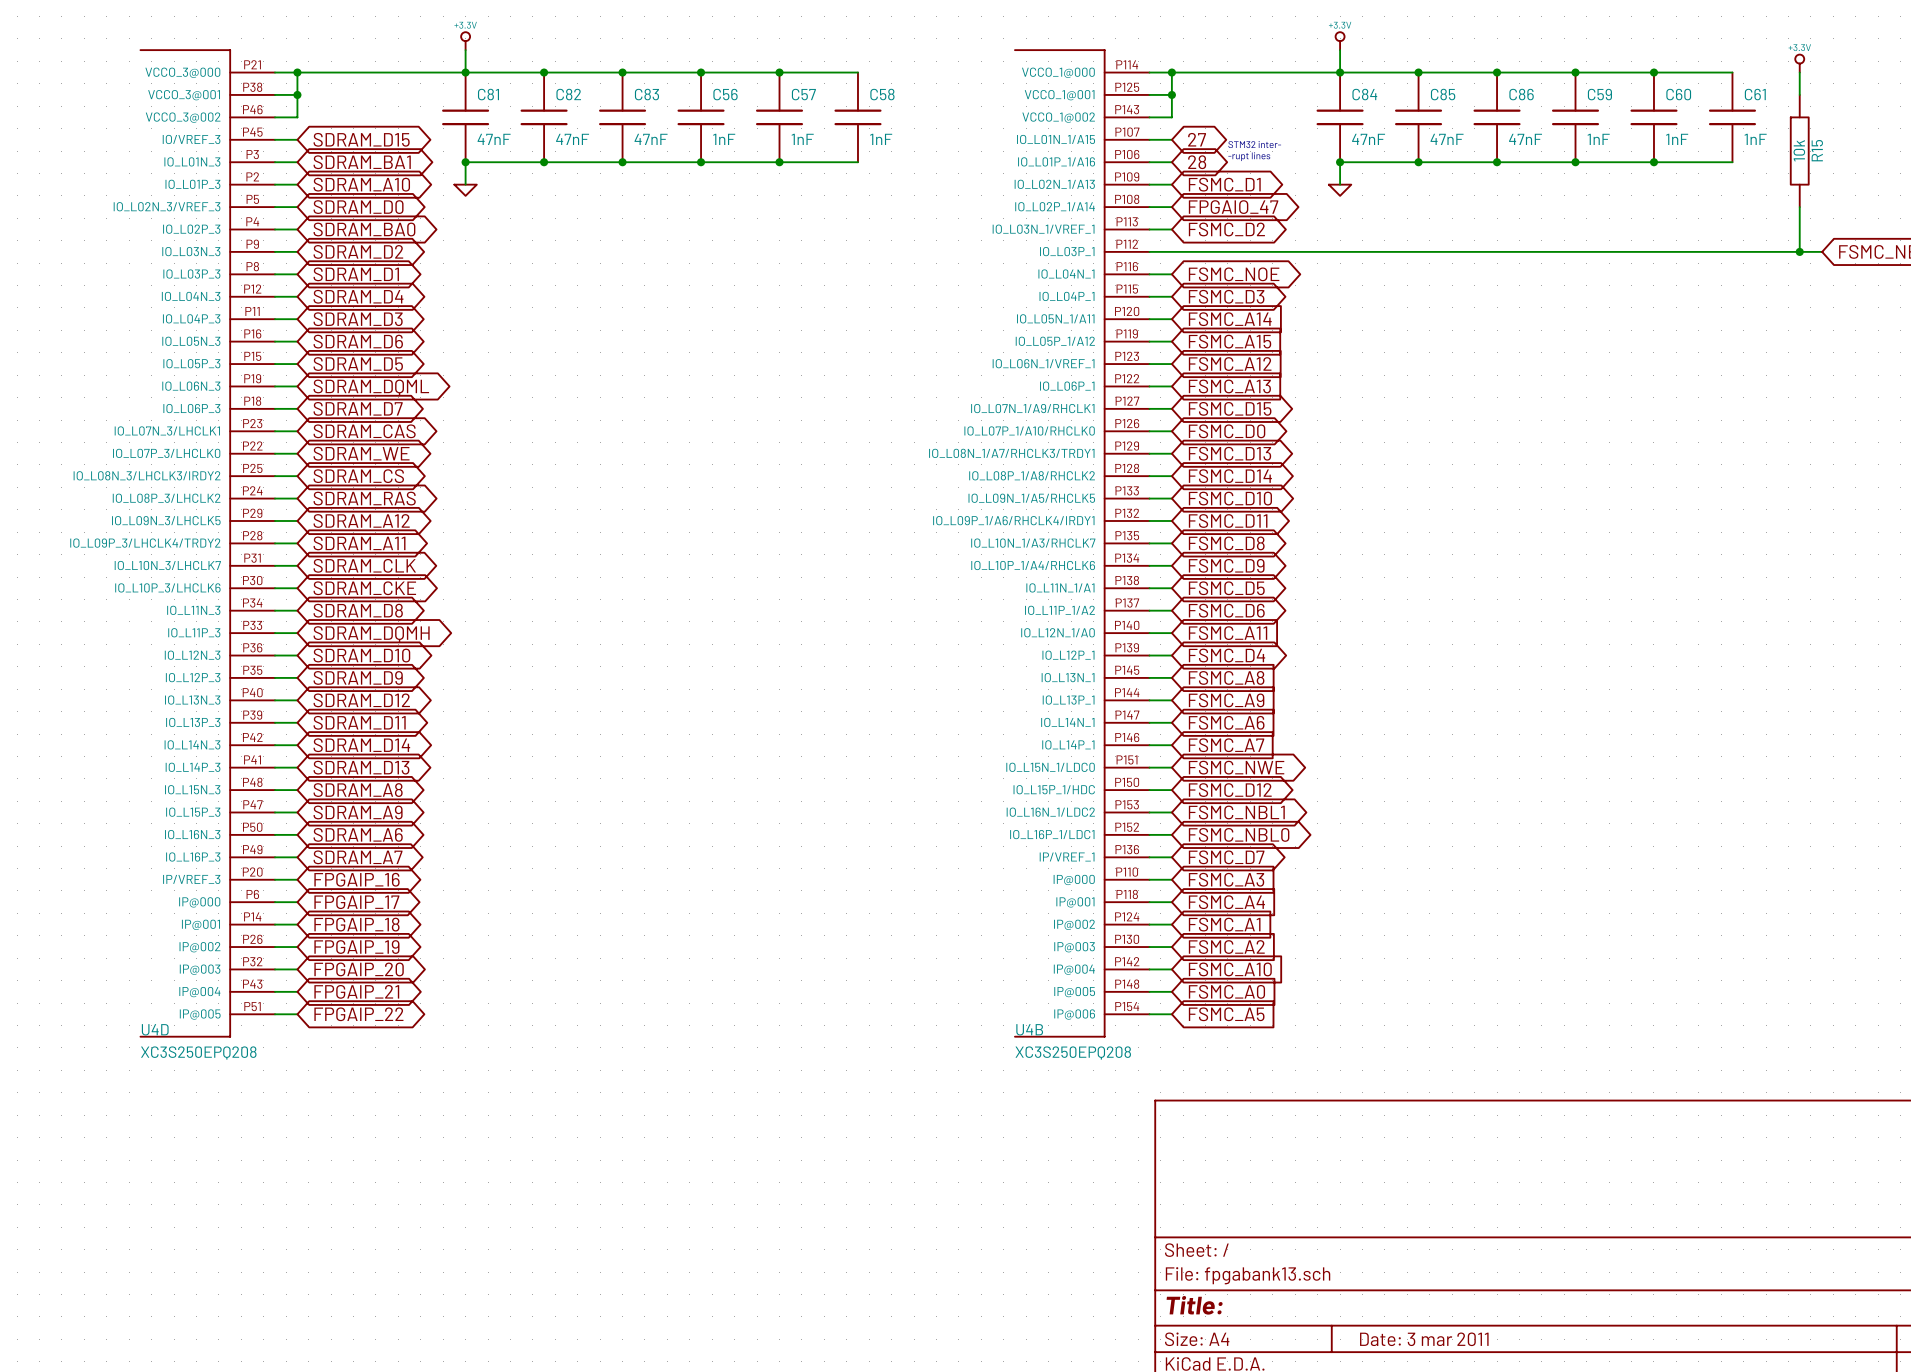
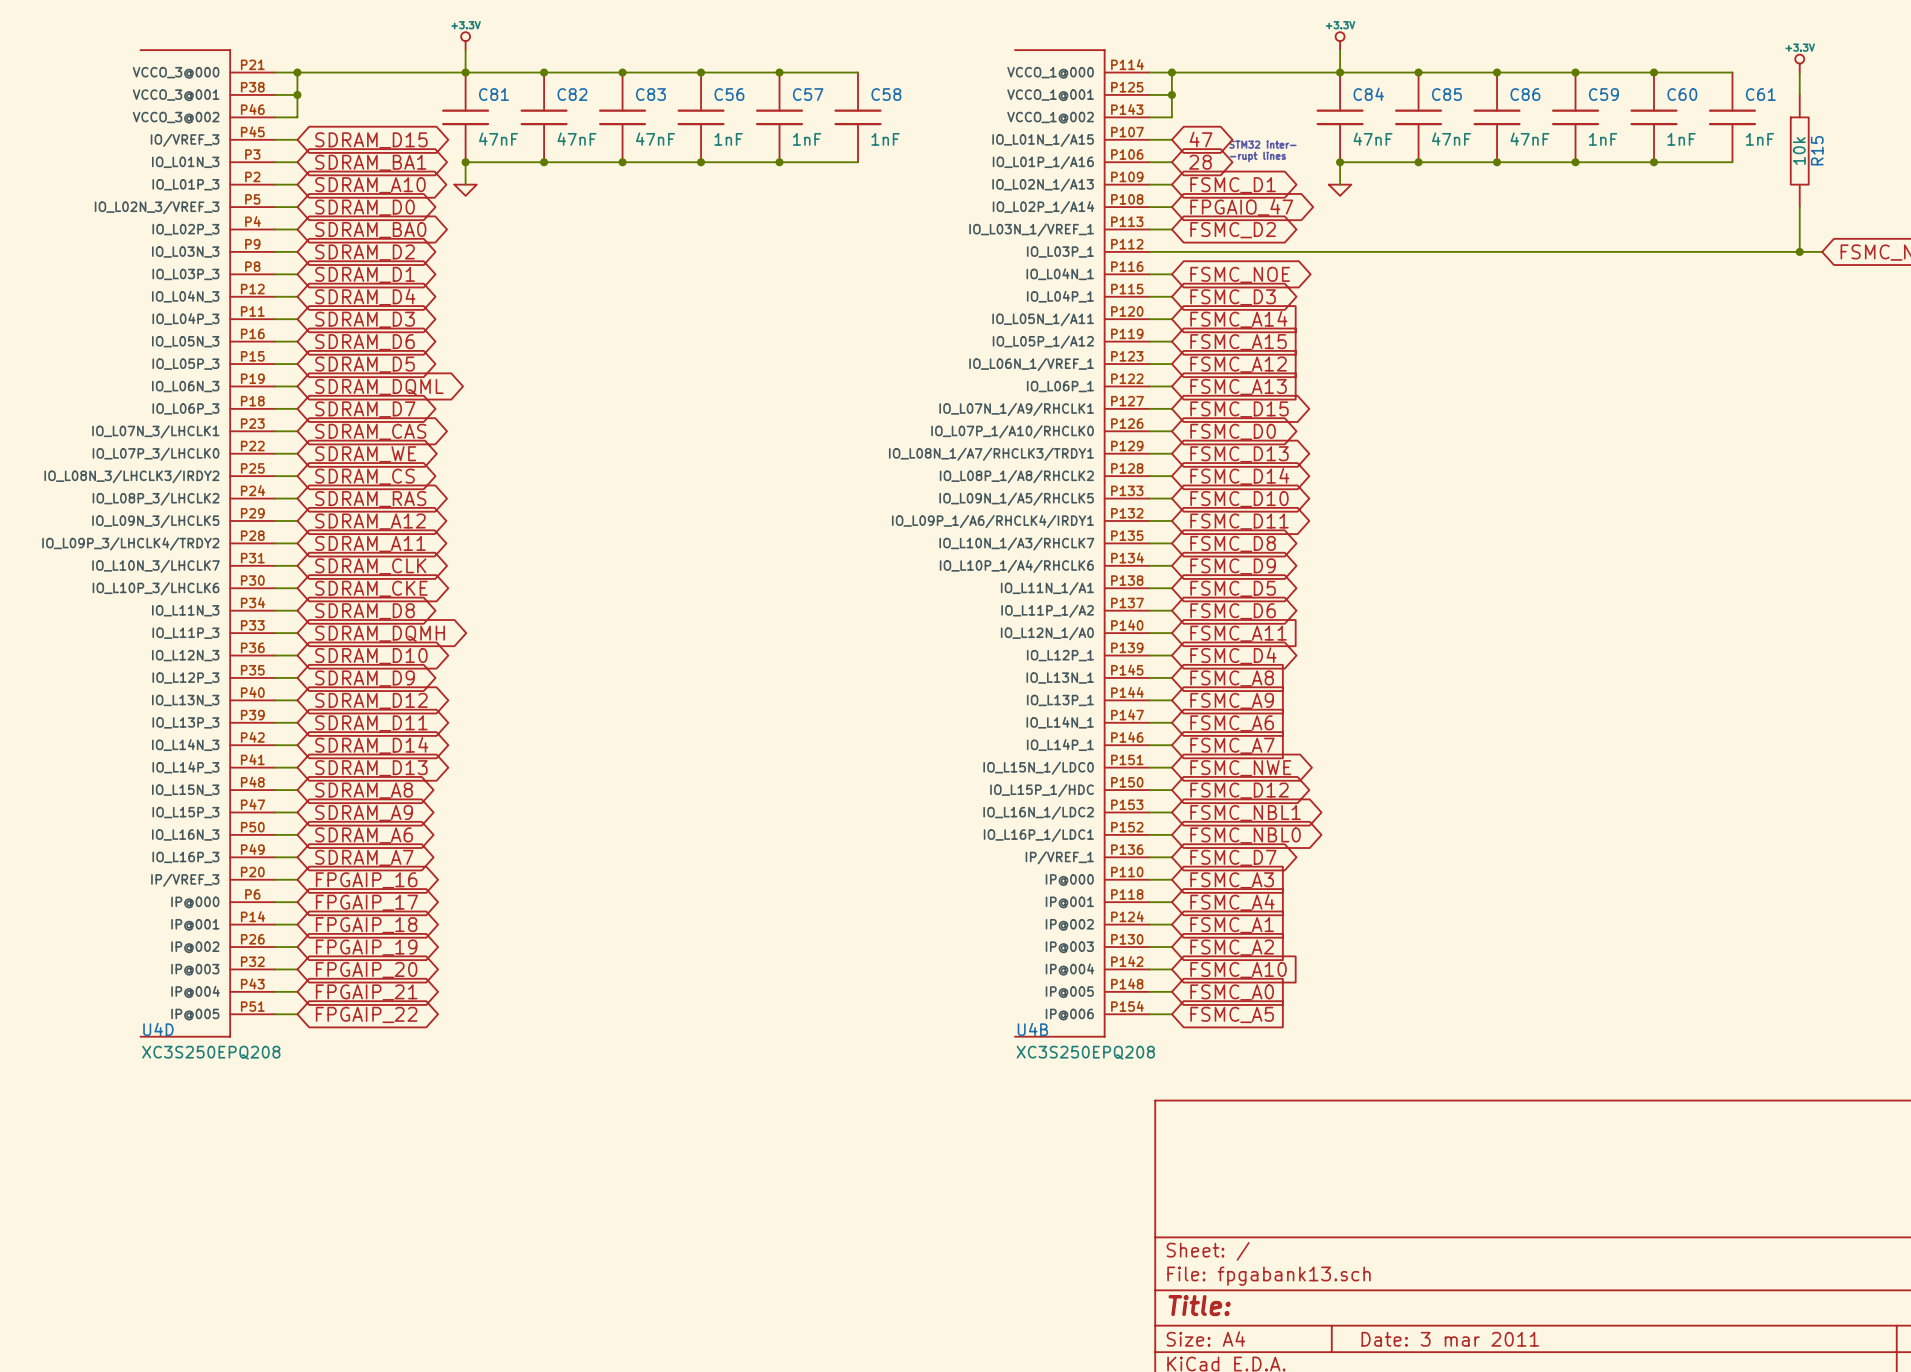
global label: 27 (1197, 139) -> 47 (1201, 139)

